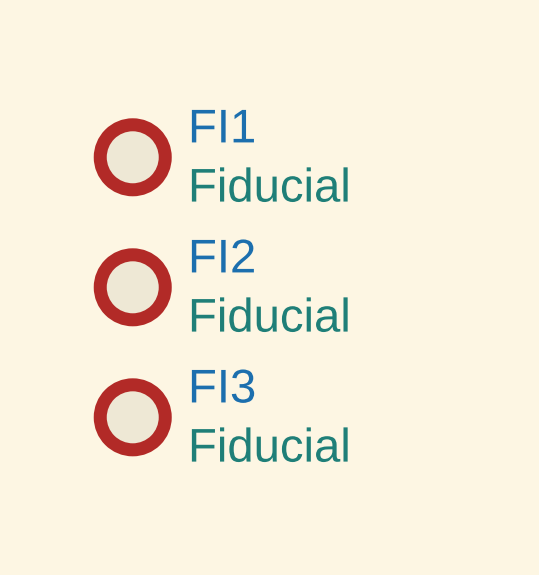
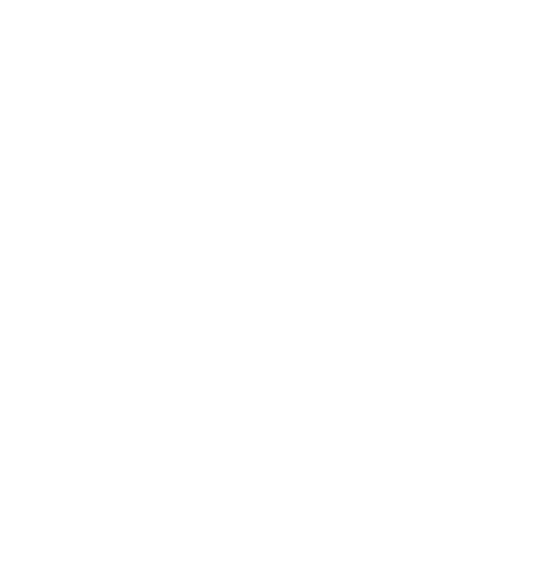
FI1: Fiducial (132, 157) -> none
FI2: Fiducial (132, 287) -> none
FI3: Fiducial (132, 417) -> none

